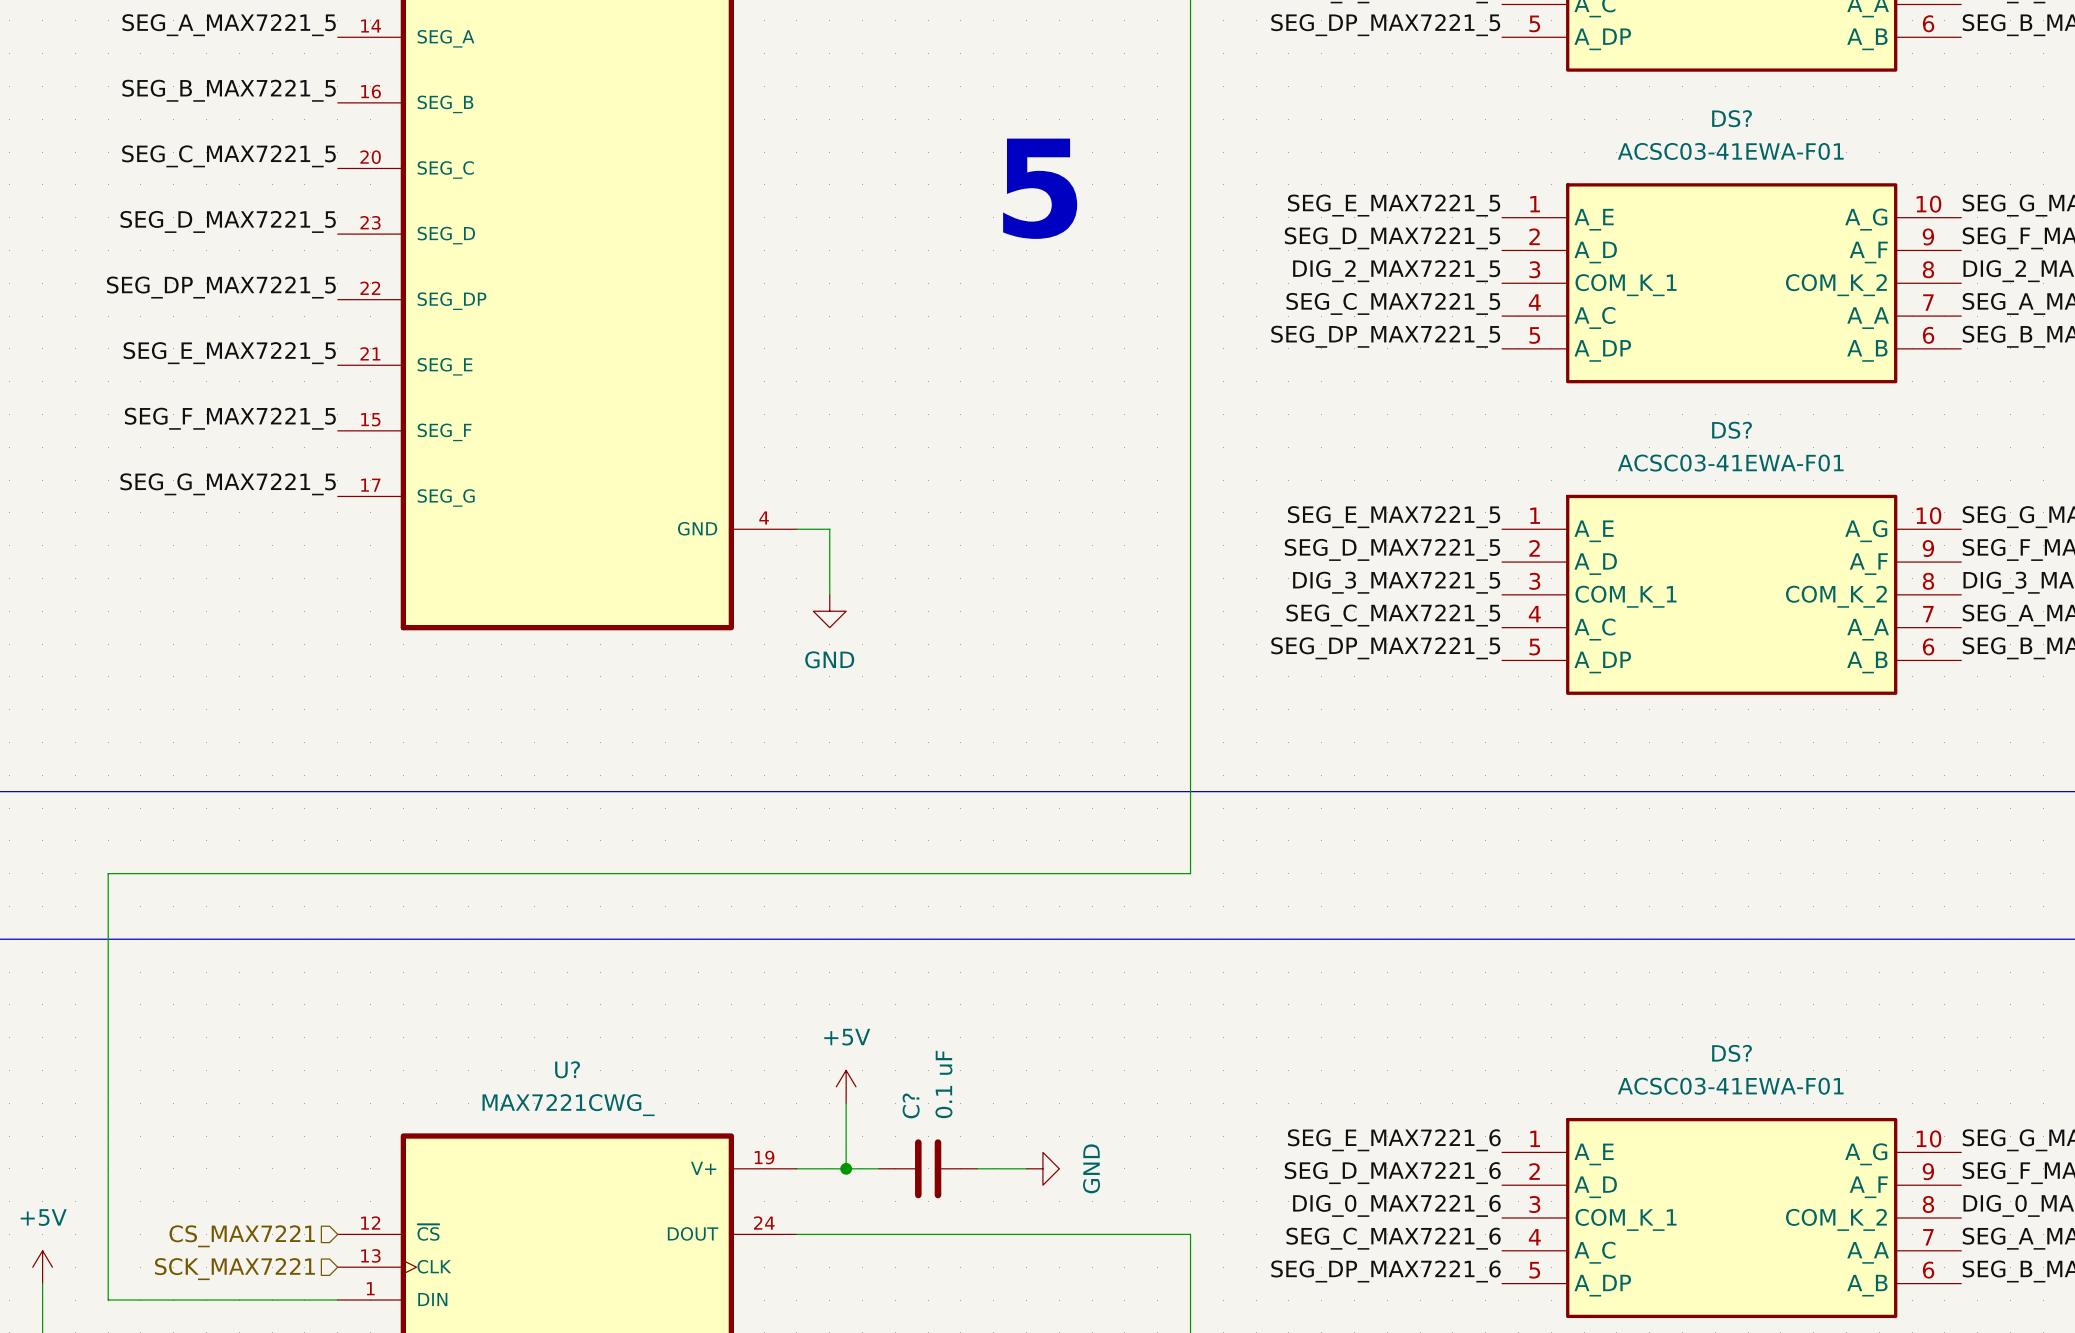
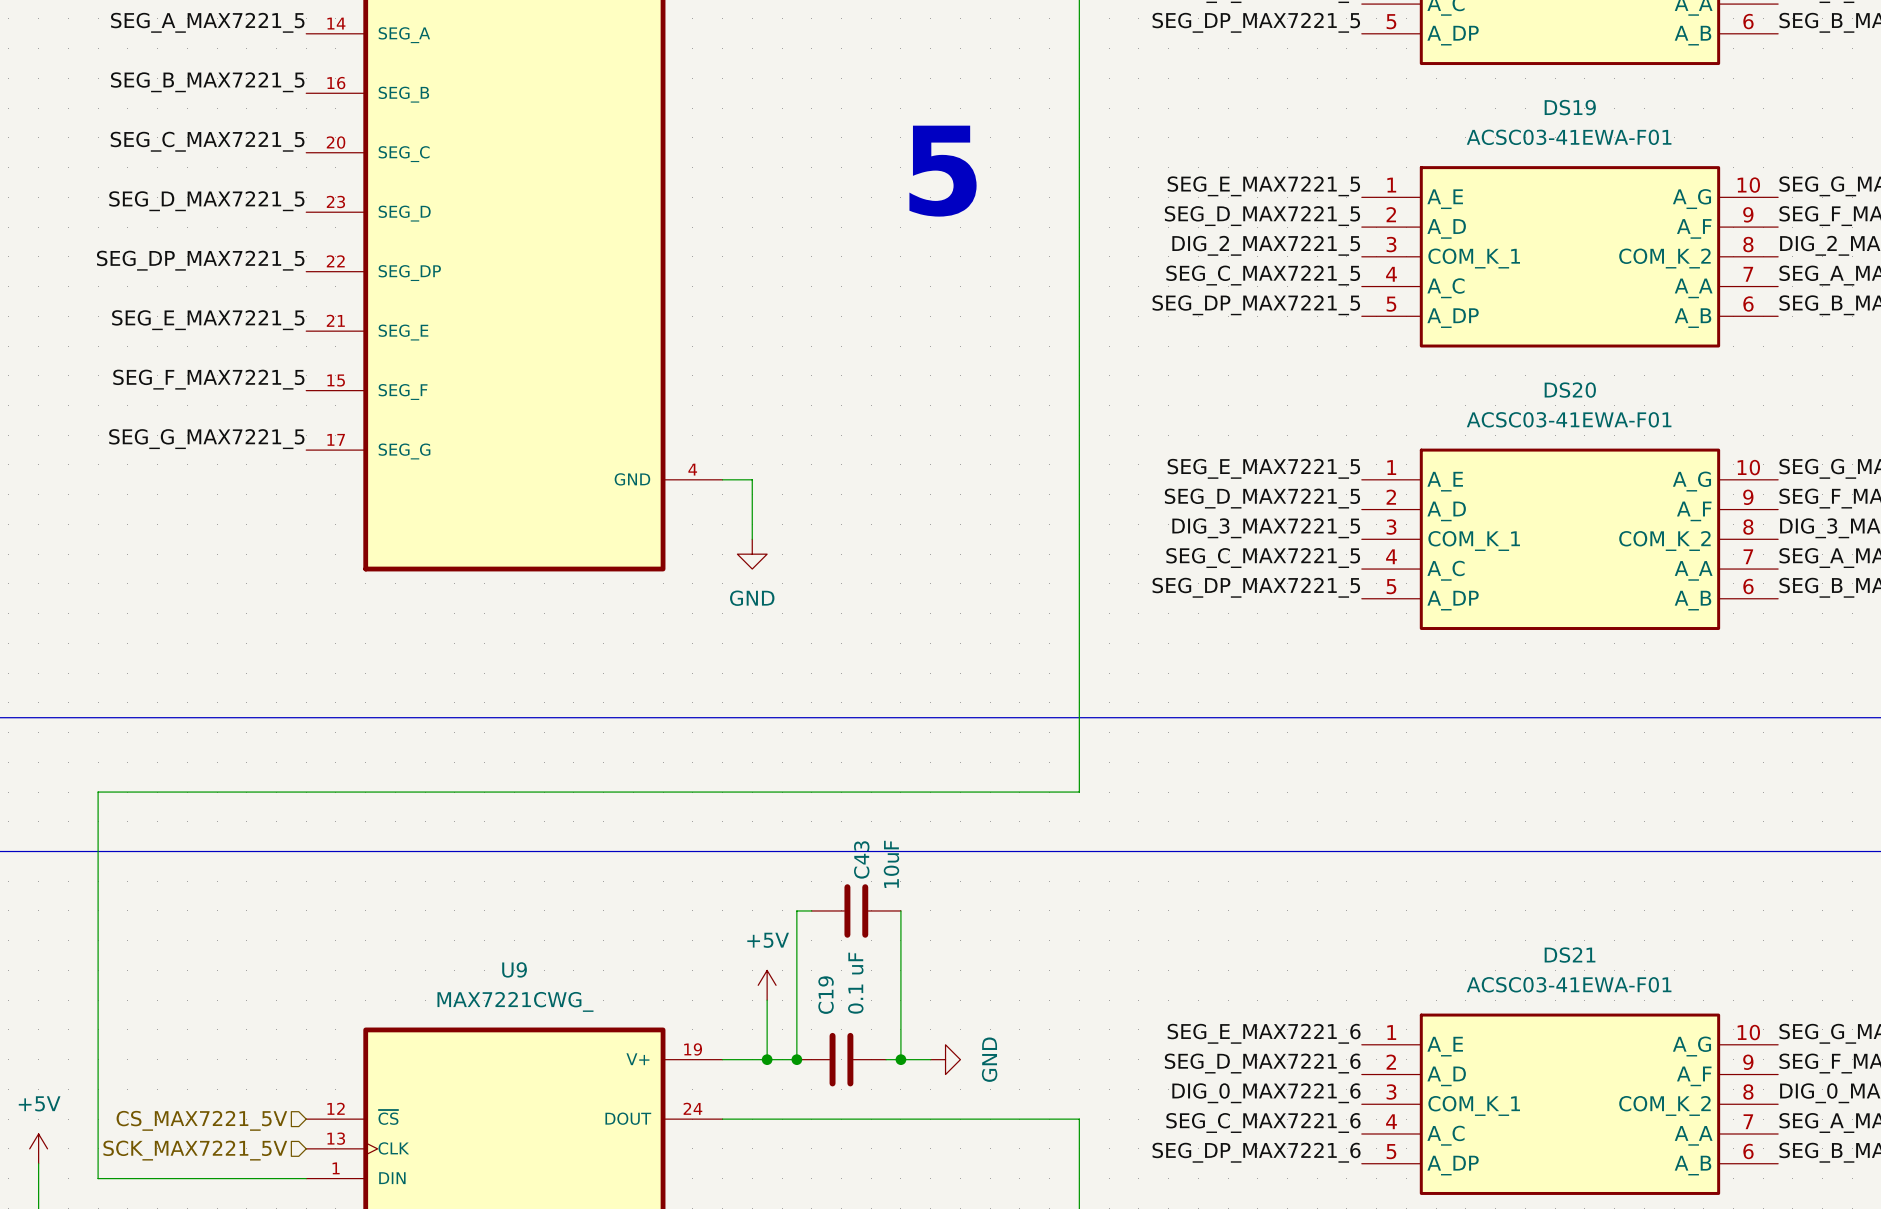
DS? name: DS? (1732, 118) -> DS19 (1570, 107)
DS? name: DS? (1732, 430) -> DS20 (1570, 390)
wire: none -> (811, 910) (796, 910) (796, 1059)
C43: none -> 10uF (856, 910)
wire: none -> (900, 910) (900, 1059)
DS? name: DS? (1732, 1053) -> DS21 (1570, 955)
U? name: U? (567, 1069) -> U9 (514, 969)
C? name: C? (911, 1105) -> C19 (826, 995)
junction: none -> (796, 1059)
junction: none -> (900, 1059)
hierarchical label: CS_MAX7221 (242, 1236) -> CS_MAX7221_5V (201, 1120)
hierarchical label: SCK_MAX7221 (234, 1269) -> SCK_MAX7221_5V (195, 1150)

